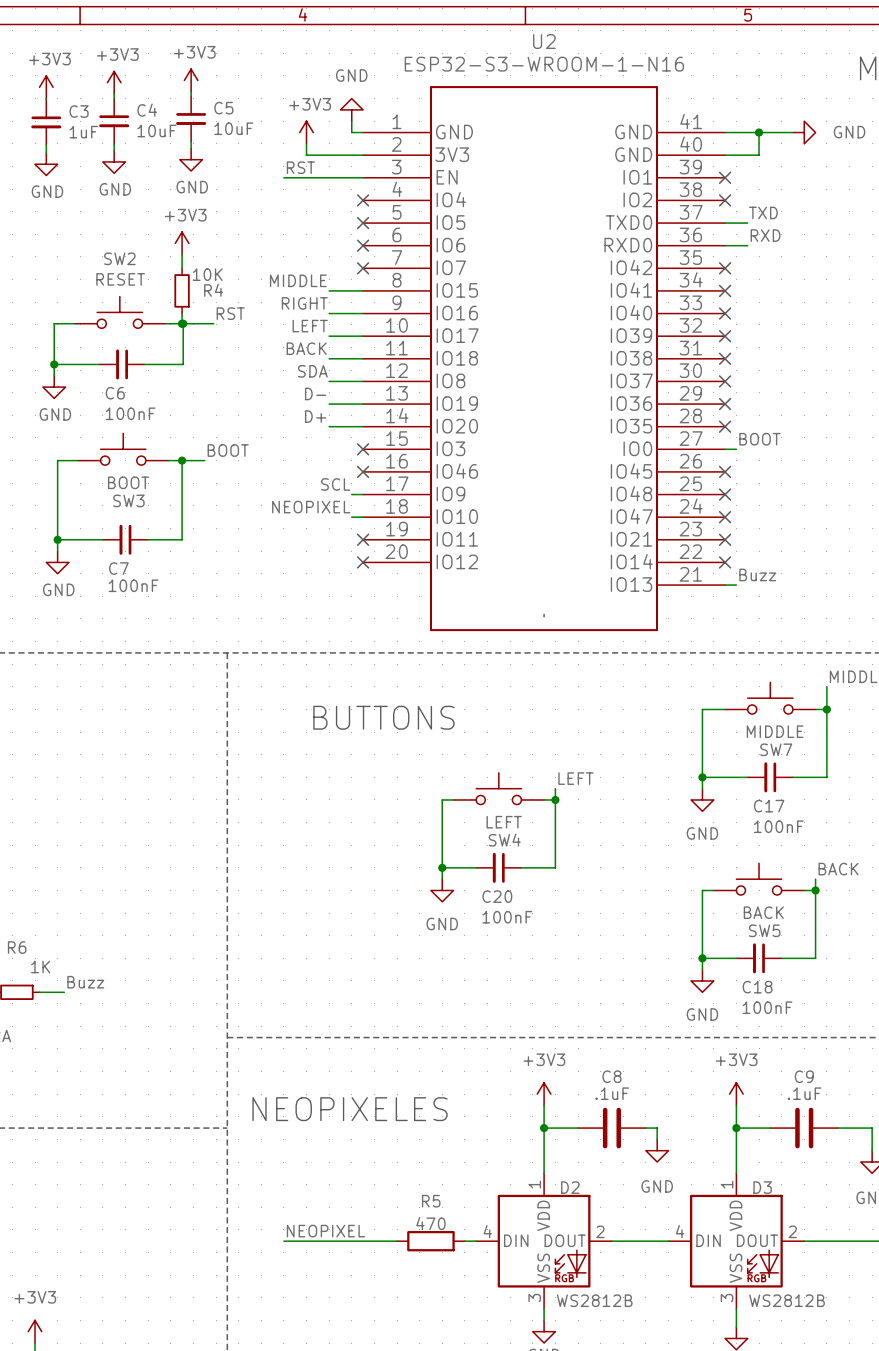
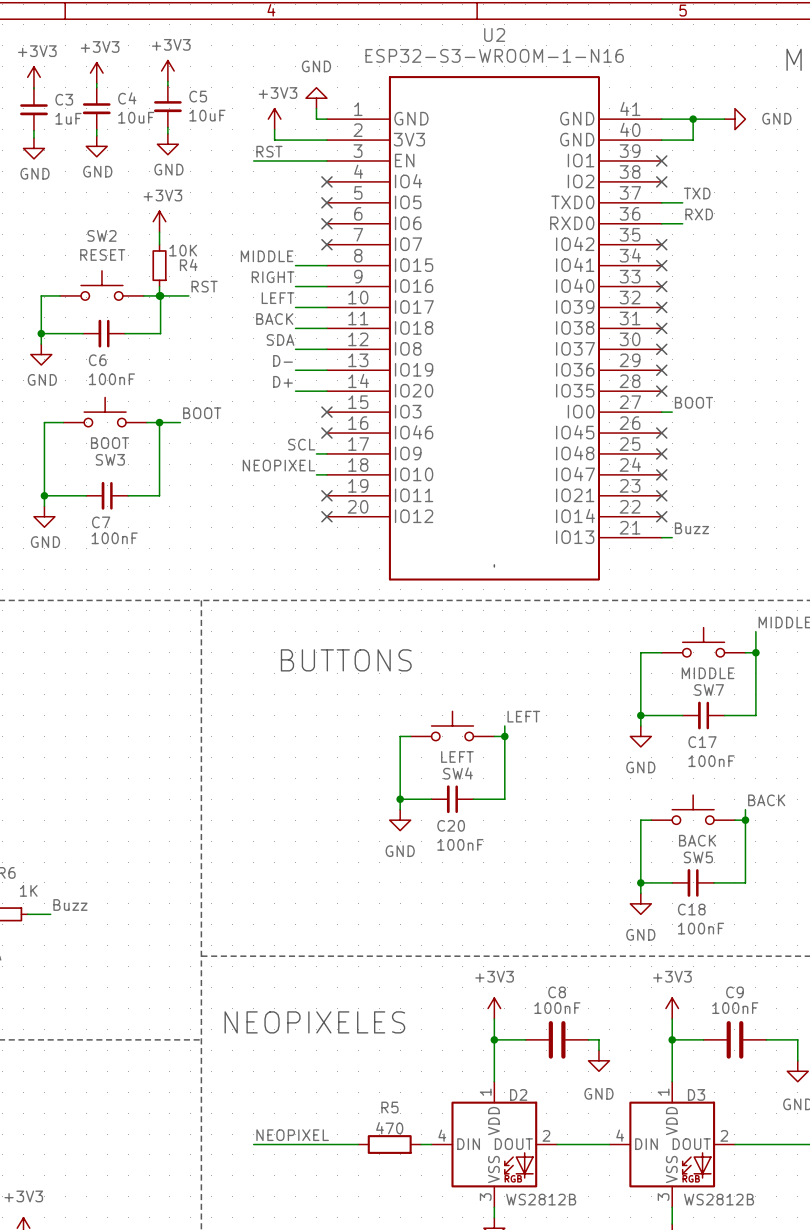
C8 value: .1uF (612, 1093) -> 100nF (557, 1008)
C9 value: .1uF (804, 1093) -> 100nF (735, 1008)

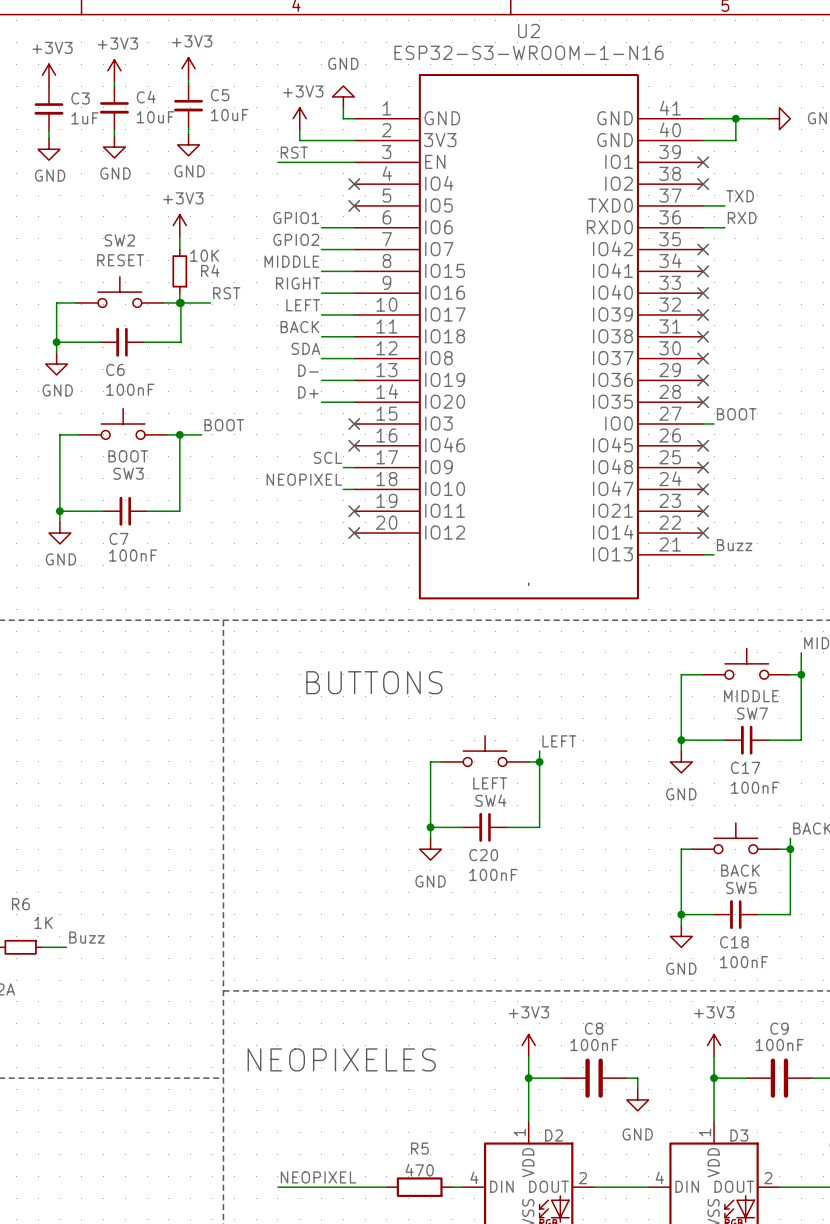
label: none -> GPIO1 (296, 218)
wire: none -> (321, 227) (354, 227)
no-connect mark: (326, 223) -> none
label: none -> GPIO2 (296, 239)
wire: none -> (321, 249) (354, 249)
no-connect mark: (326, 244) -> none

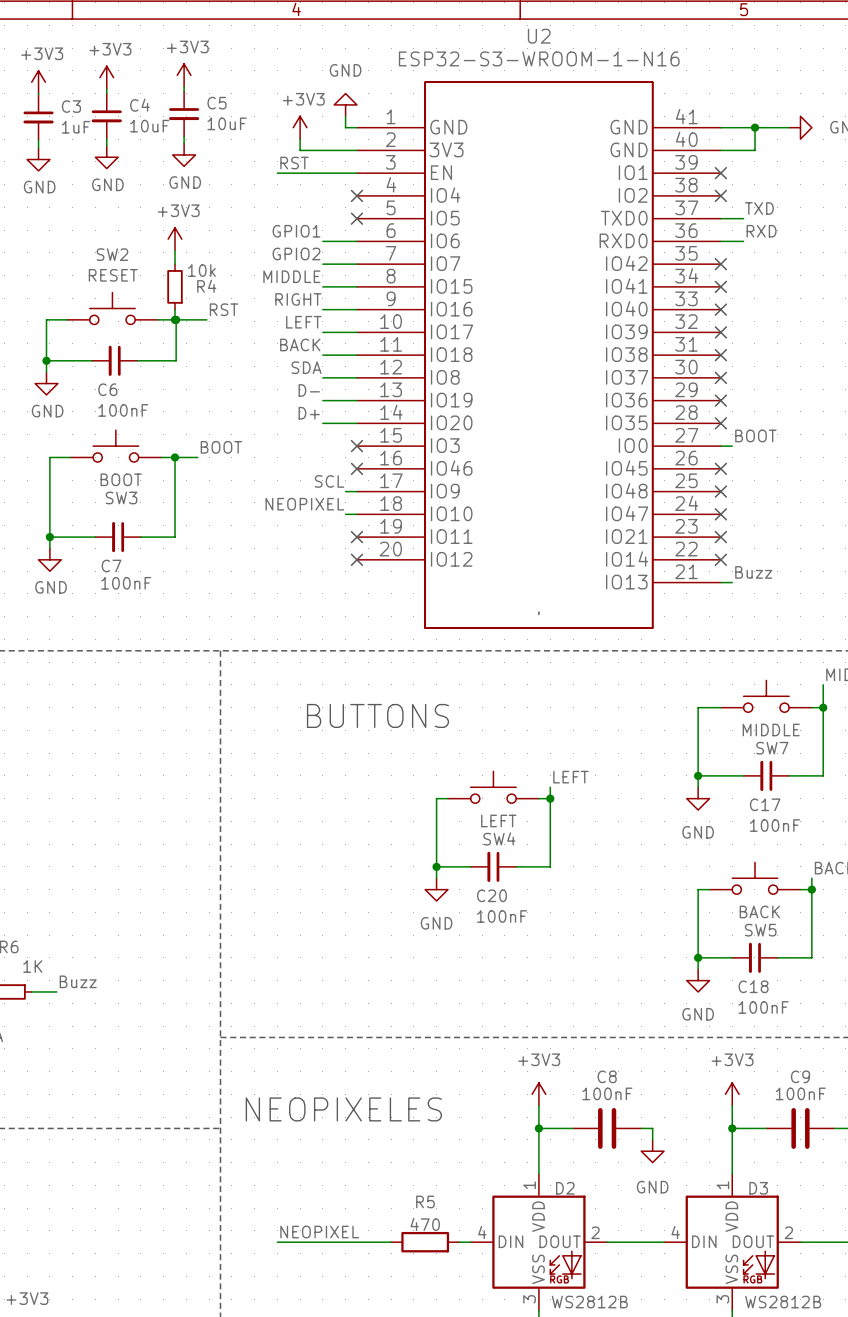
R4 value: 10K (204, 255) -> 10k (201, 270)

